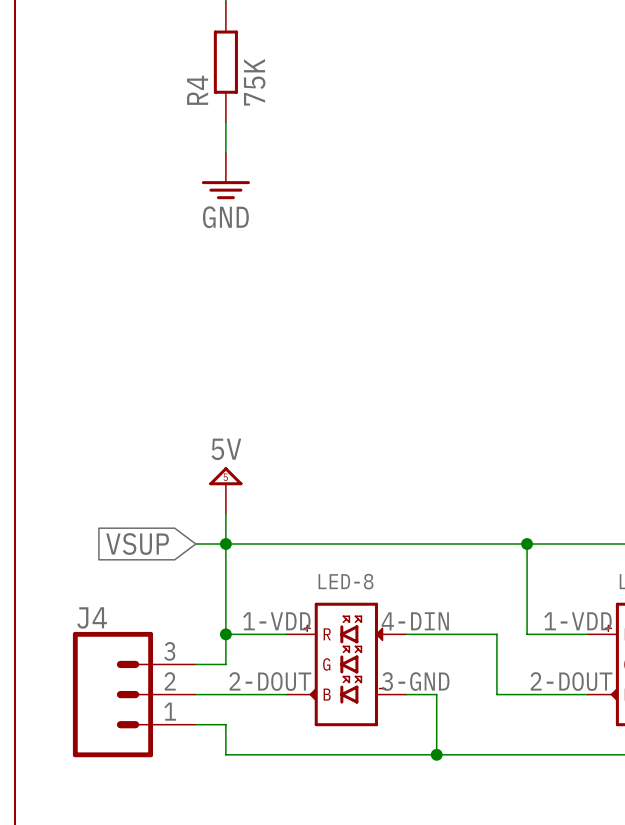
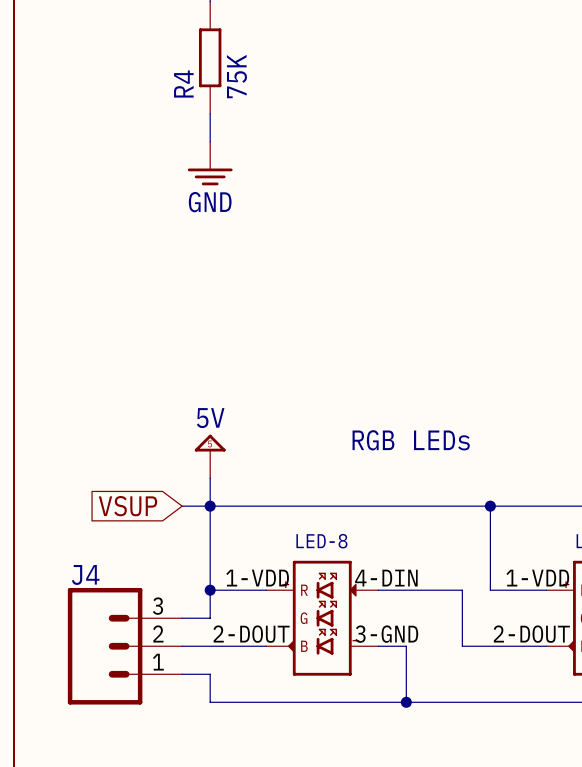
text: none -> RGB LEDs (411, 440)

